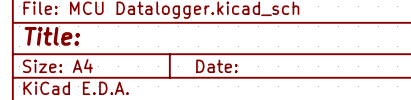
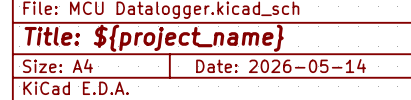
title block: Title: (52, 36) -> Title: ${project_name} (154, 38)
title block: Date: (216, 66) -> Date: 2026-05-14 (281, 66)

